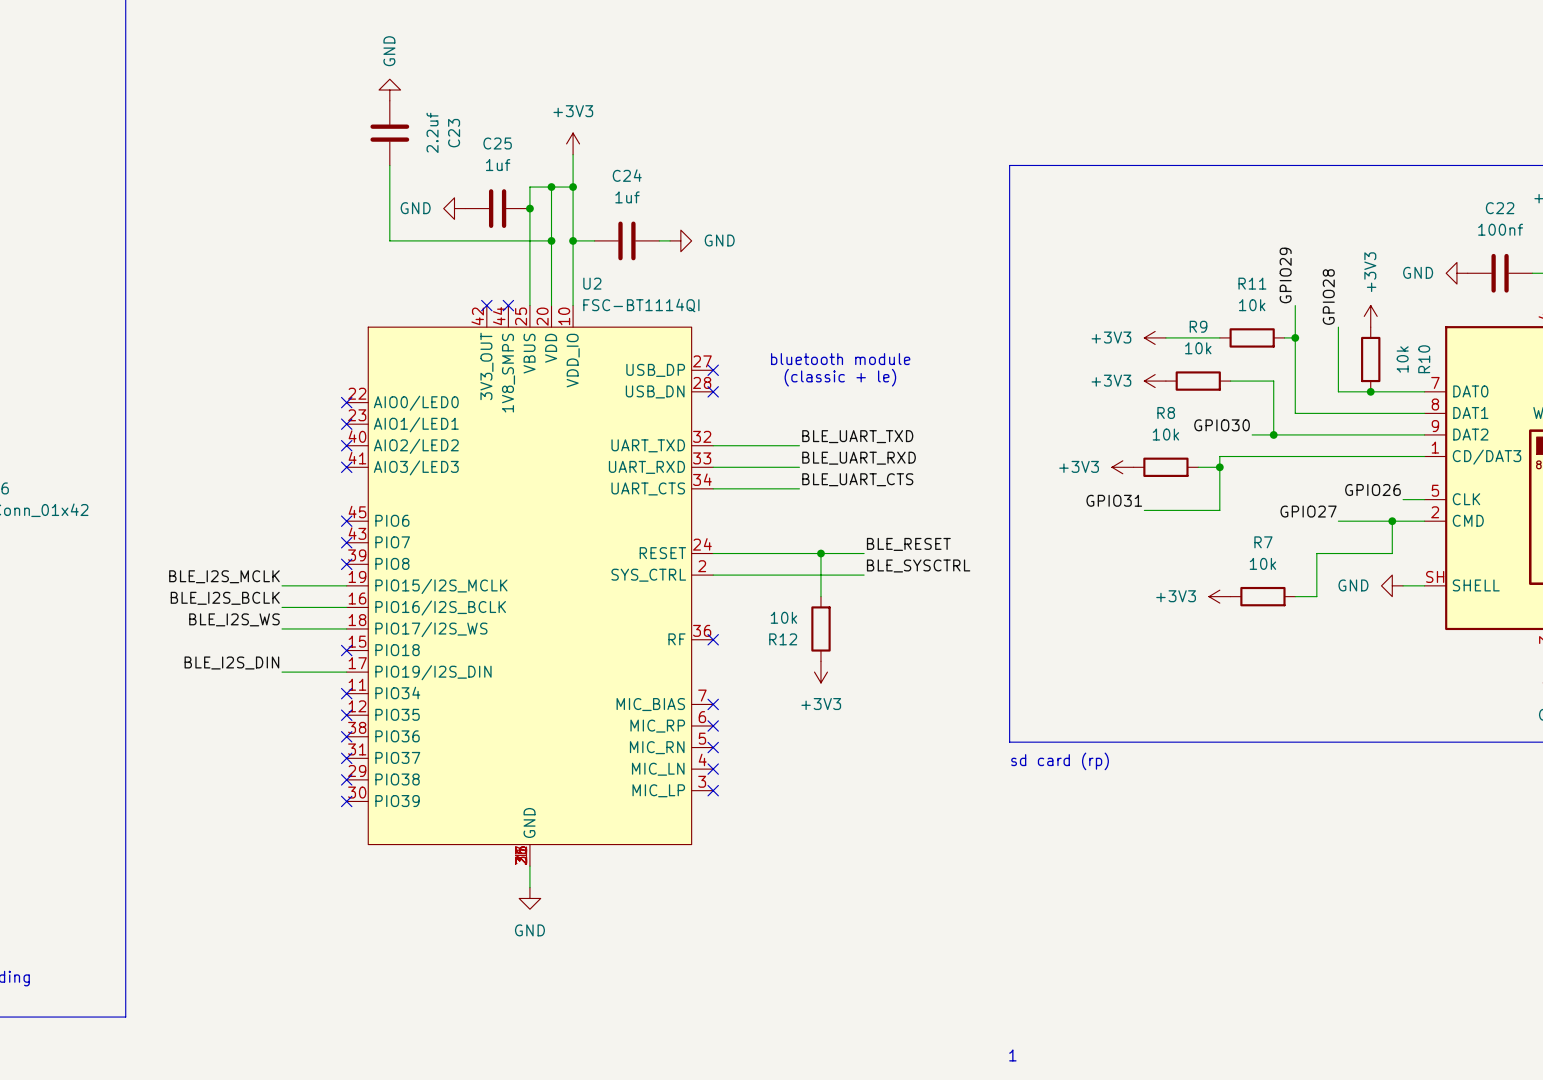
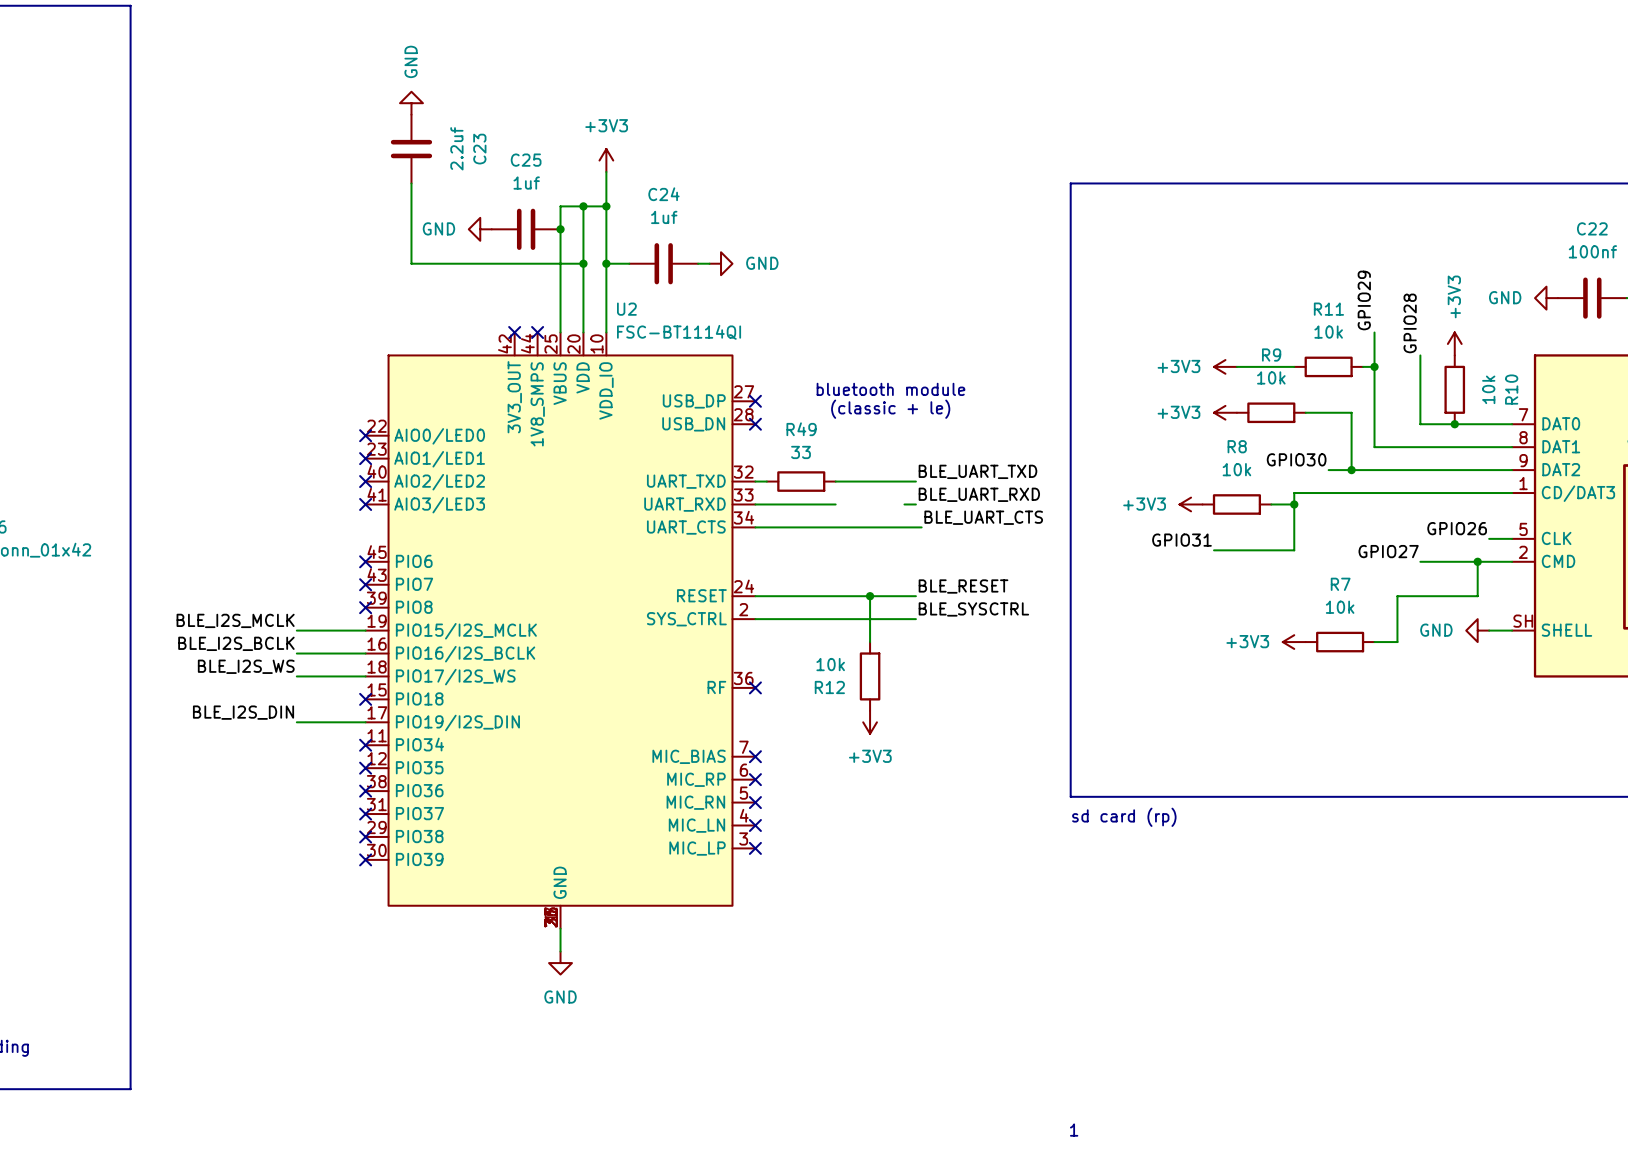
label position: BLE_UART_TXD (857, 436) -> BLE_UART_TXD (977, 471)
wire: (723, 445) (788, 445) -> (847, 481) (915, 481)
R49: none -> 33 (801, 481)
label position: BLE_UART_RXD (859, 458) -> BLE_UART_RXD (979, 494)
wire: (788, 467) (799, 467) -> (904, 504) (915, 504)
label position: BLE_UART_CTS (857, 479) -> BLE_UART_CTS (983, 517)
wire: none -> (847, 527) (921, 527)

